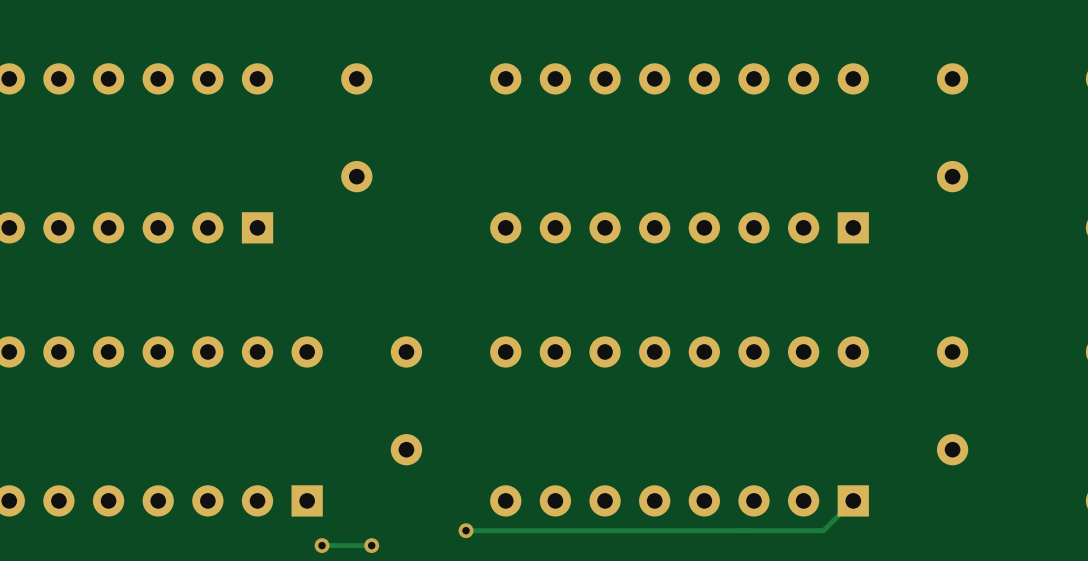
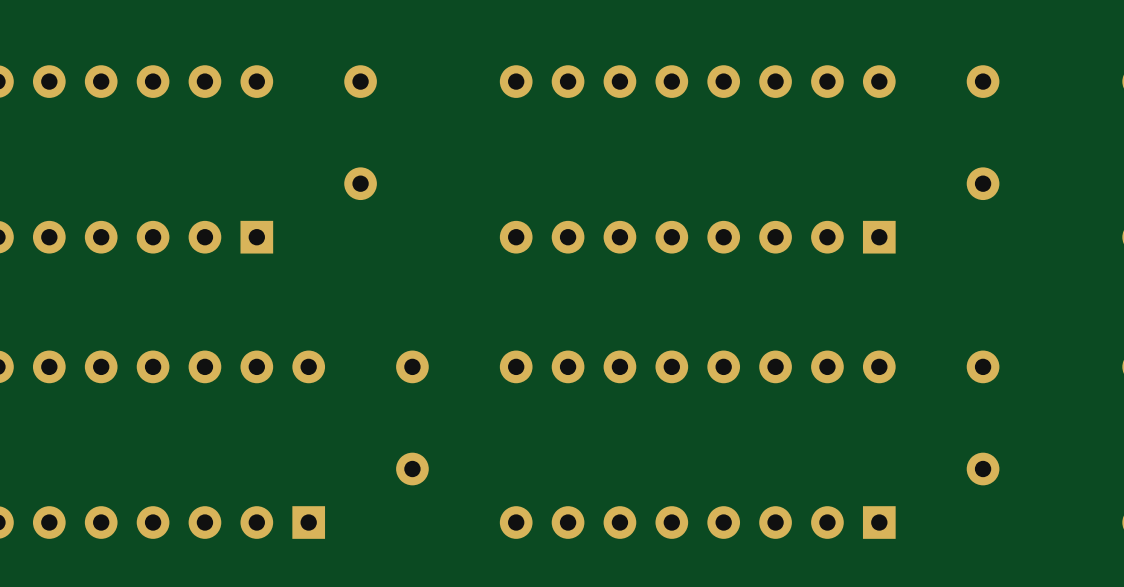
track: (853, 500) (823, 530) (466, 530) -> none
via: (466, 530) -> none
via: (322, 545) -> none
track: (371, 545) (322, 545) -> none
via: (371, 545) -> none

